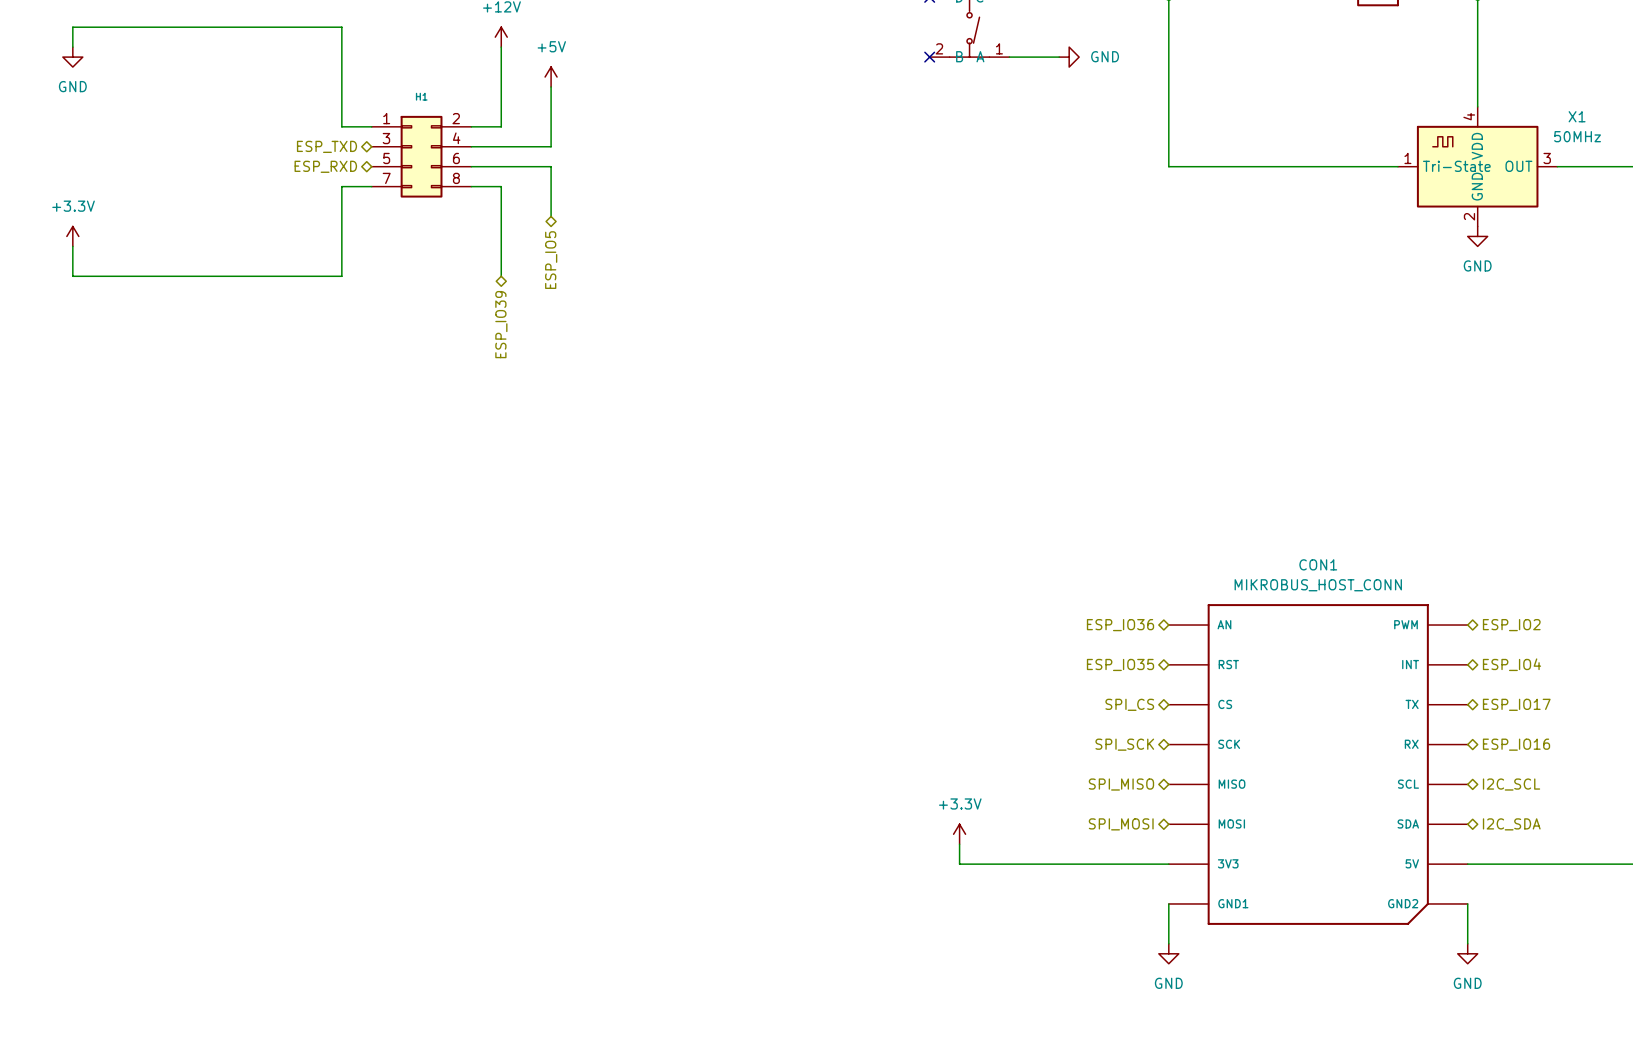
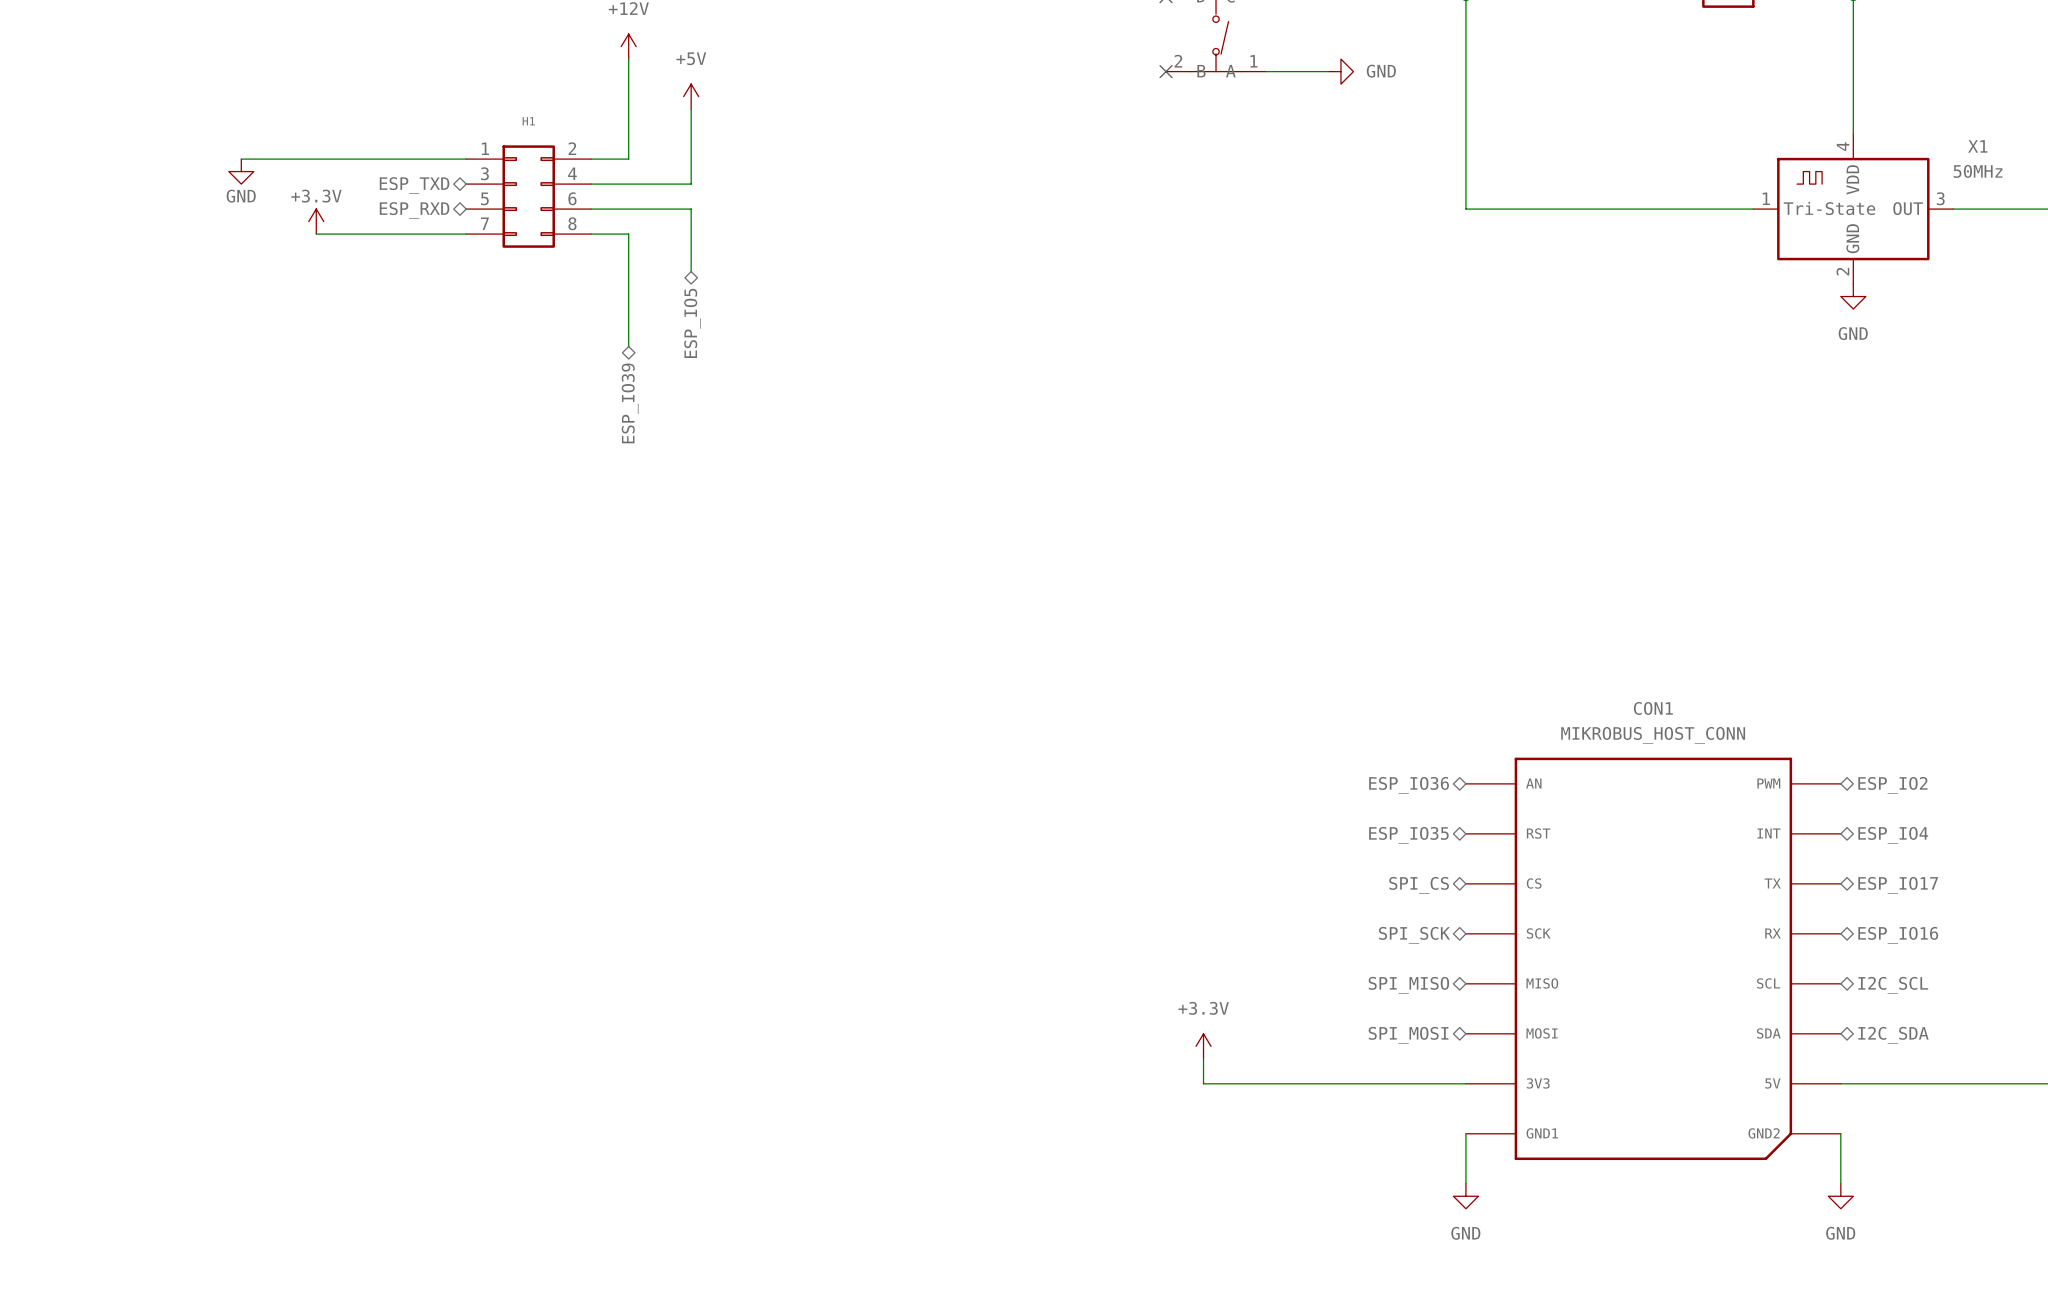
wire: (72, 47) (72, 27) (341, 27) (341, 126) -> (241, 159) (428, 159)
power symbol position: GND (72, 57) -> GND (241, 171)
power symbol text position: GND (72, 86) -> GND (241, 196)
wire: (341, 186) (341, 276) (72, 276) (72, 246) -> (428, 234) (316, 234)
power symbol text position: +3.3V (73, 206) -> +3.3V (316, 196)
power symbol position: +3.3V (72, 236) -> +3.3V (316, 221)

